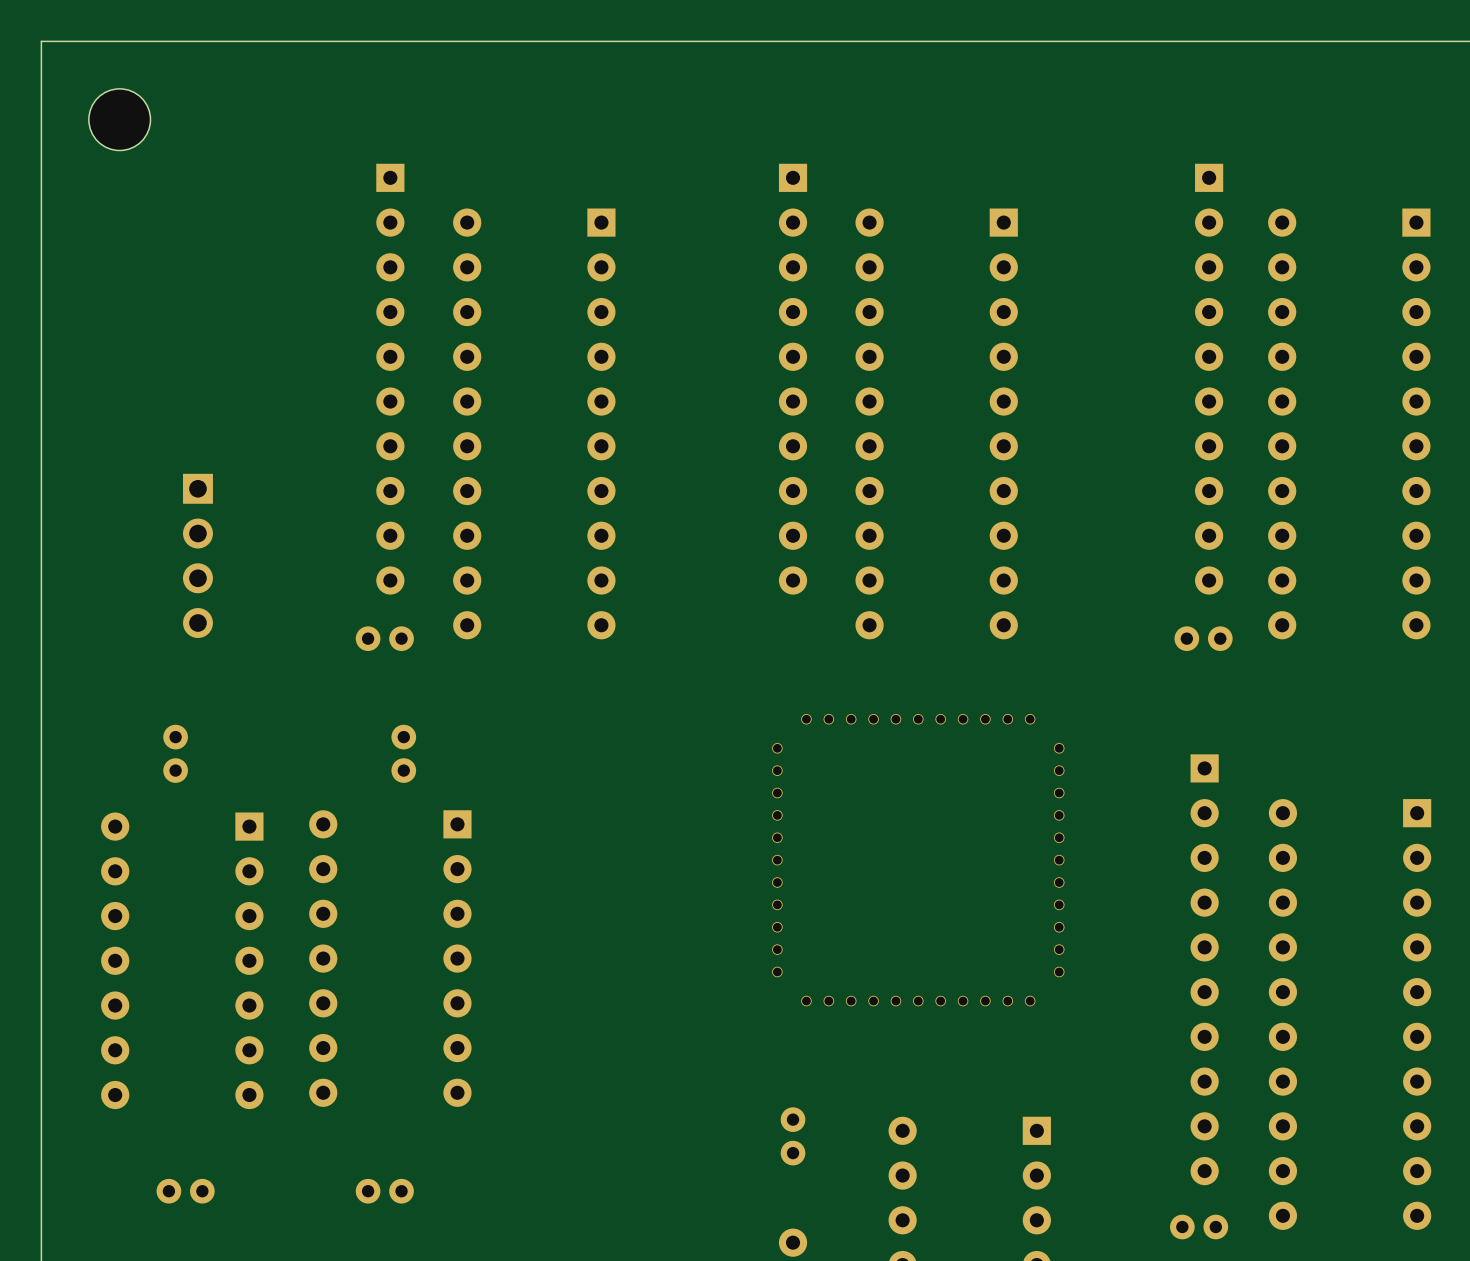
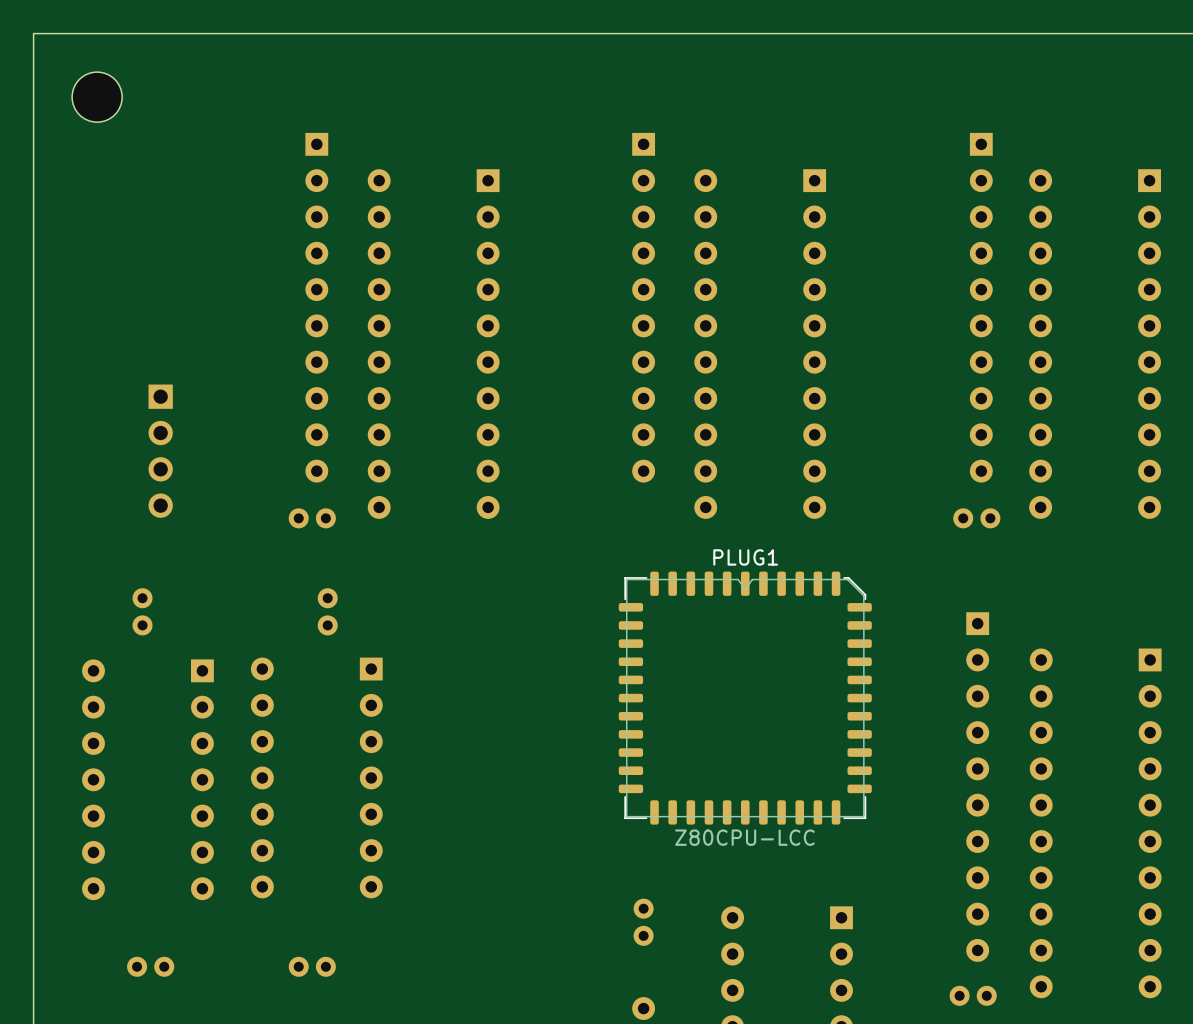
part: (918, 860) -> none
PLUG1: none -> Z80CPU-LCC (745, 698)

